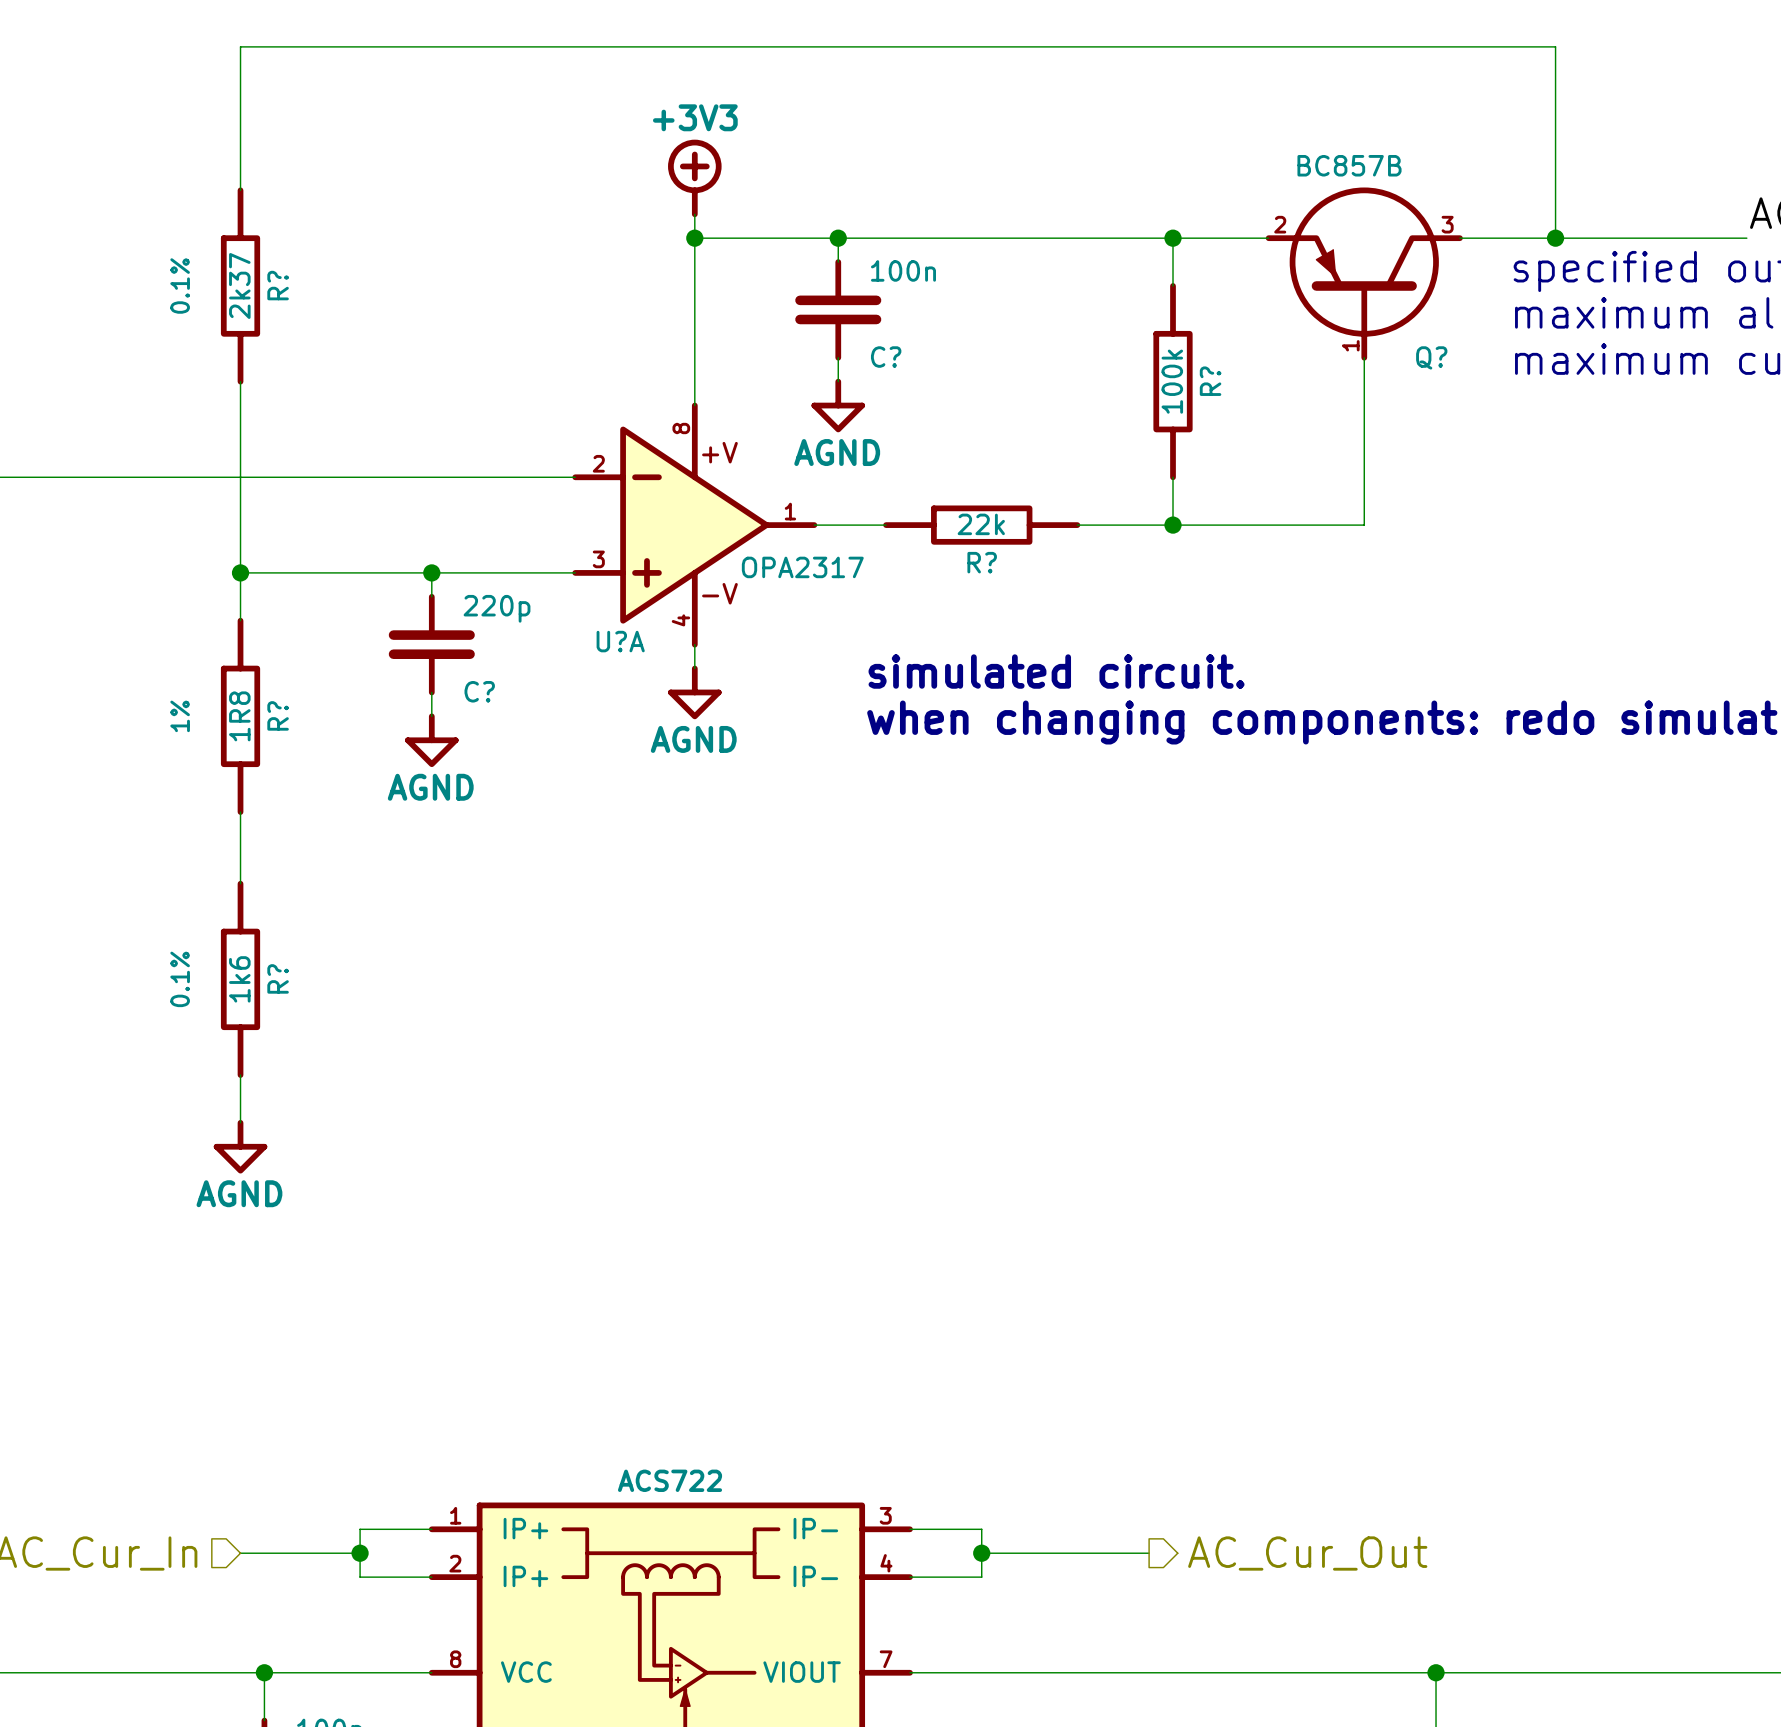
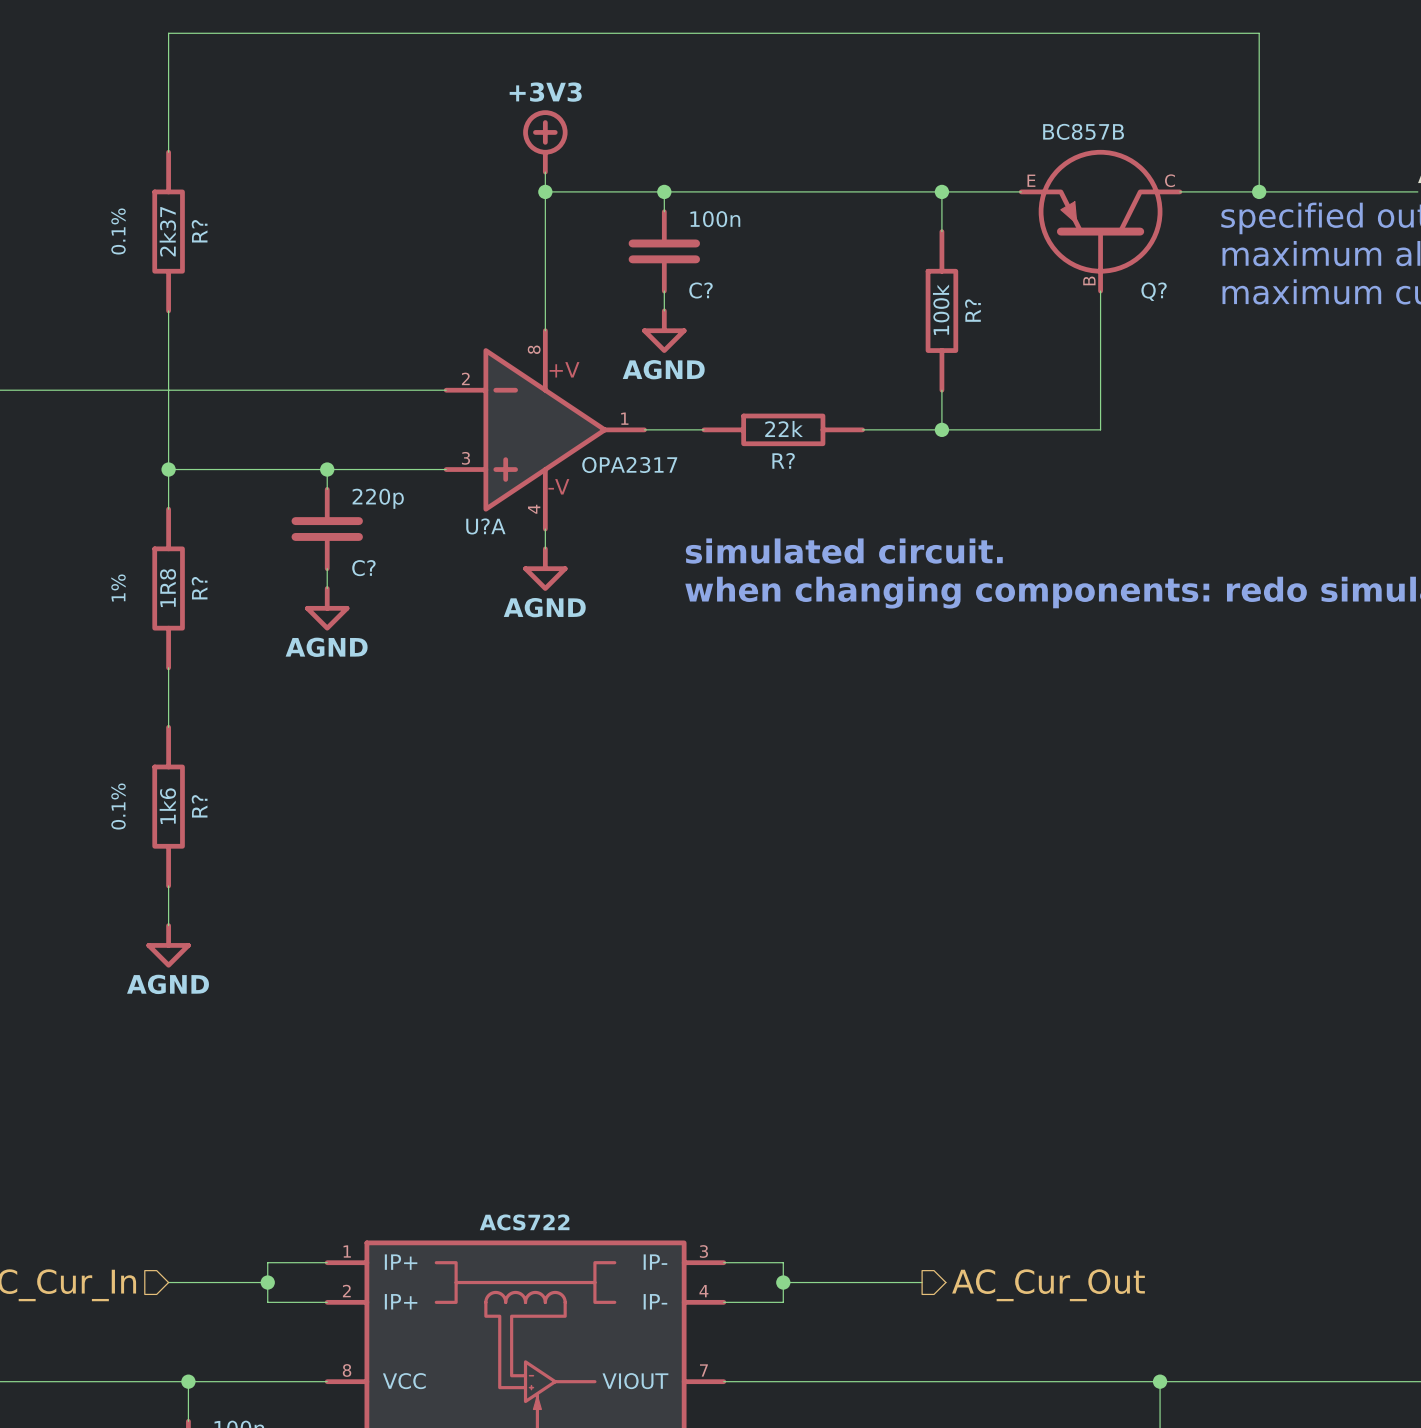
Q? pin number: 2 (1280, 224) -> E (1031, 180)
Q? pin number: 3 (1447, 224) -> C (1169, 180)
Q? pin number: 1 (1350, 345) -> B (1089, 280)

